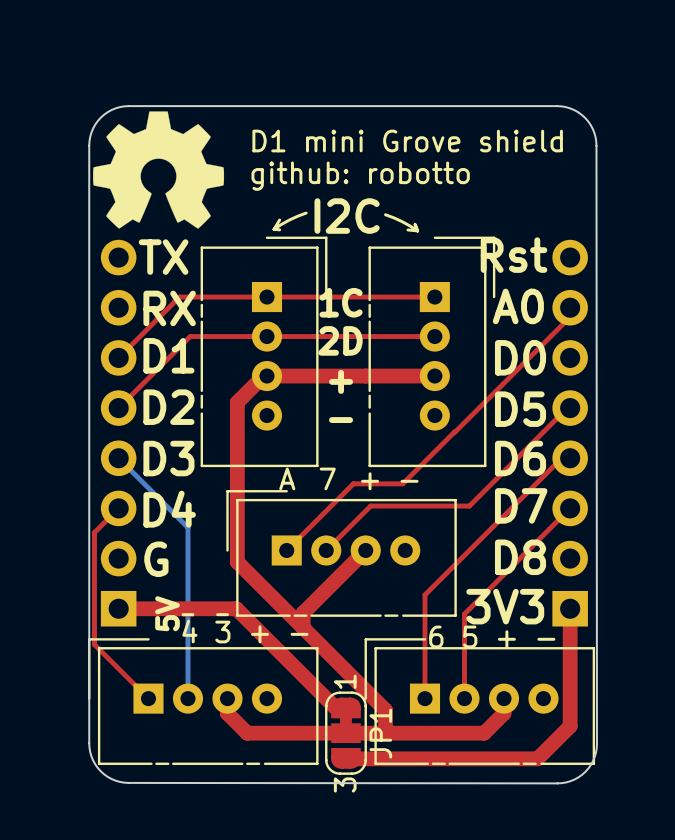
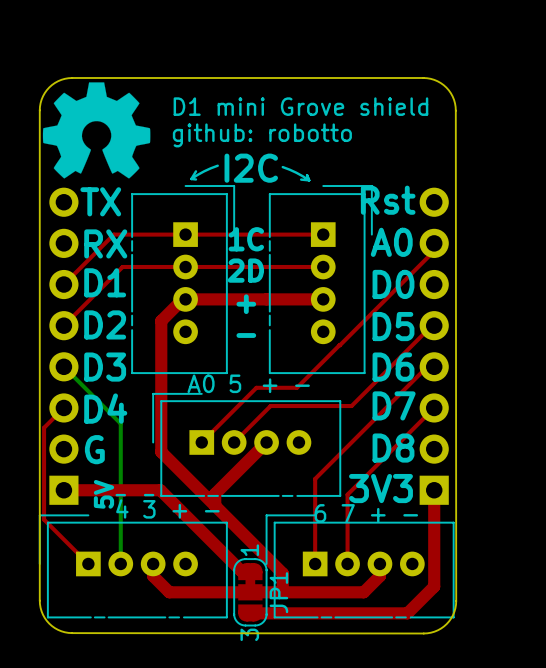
text: A (287, 478) -> A0 (201, 383)
text: 7 (327, 478) -> 5 (235, 383)
text: 6 5 + - (492, 636) -> 6 7 + - (366, 513)

